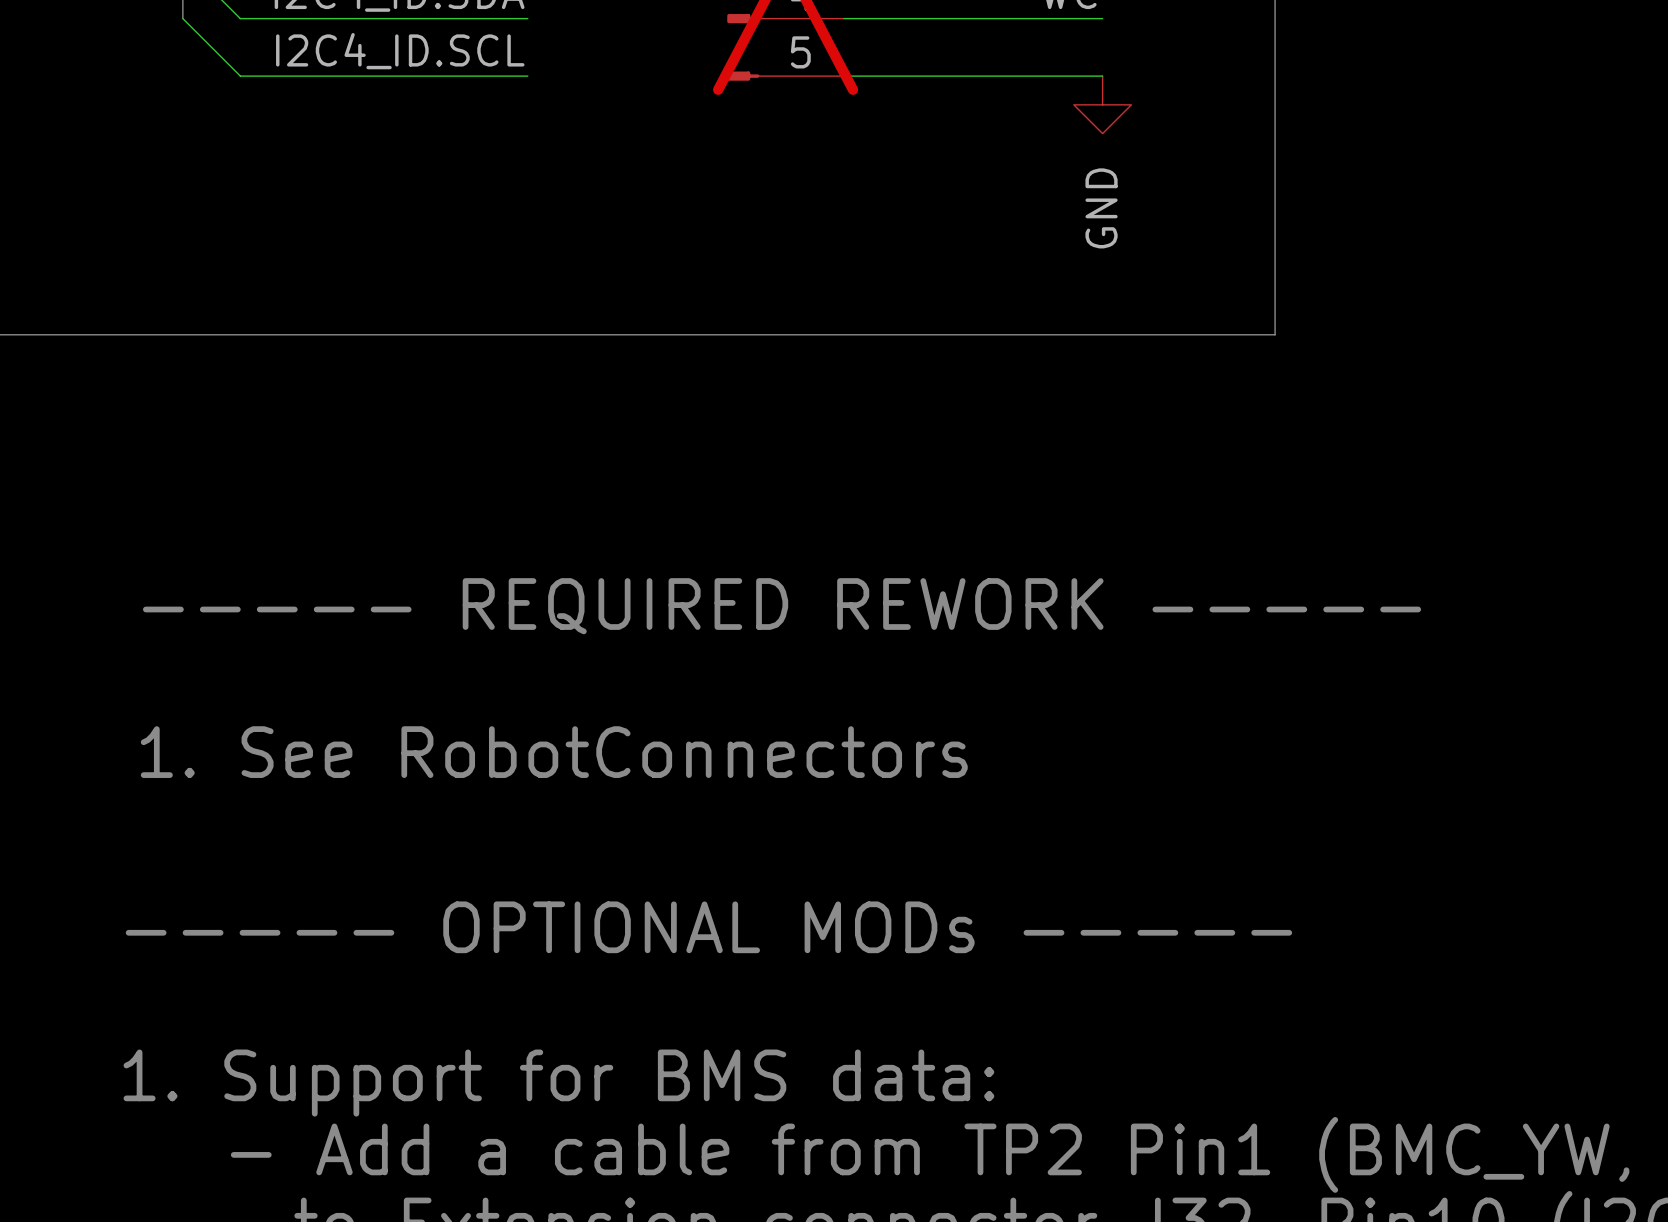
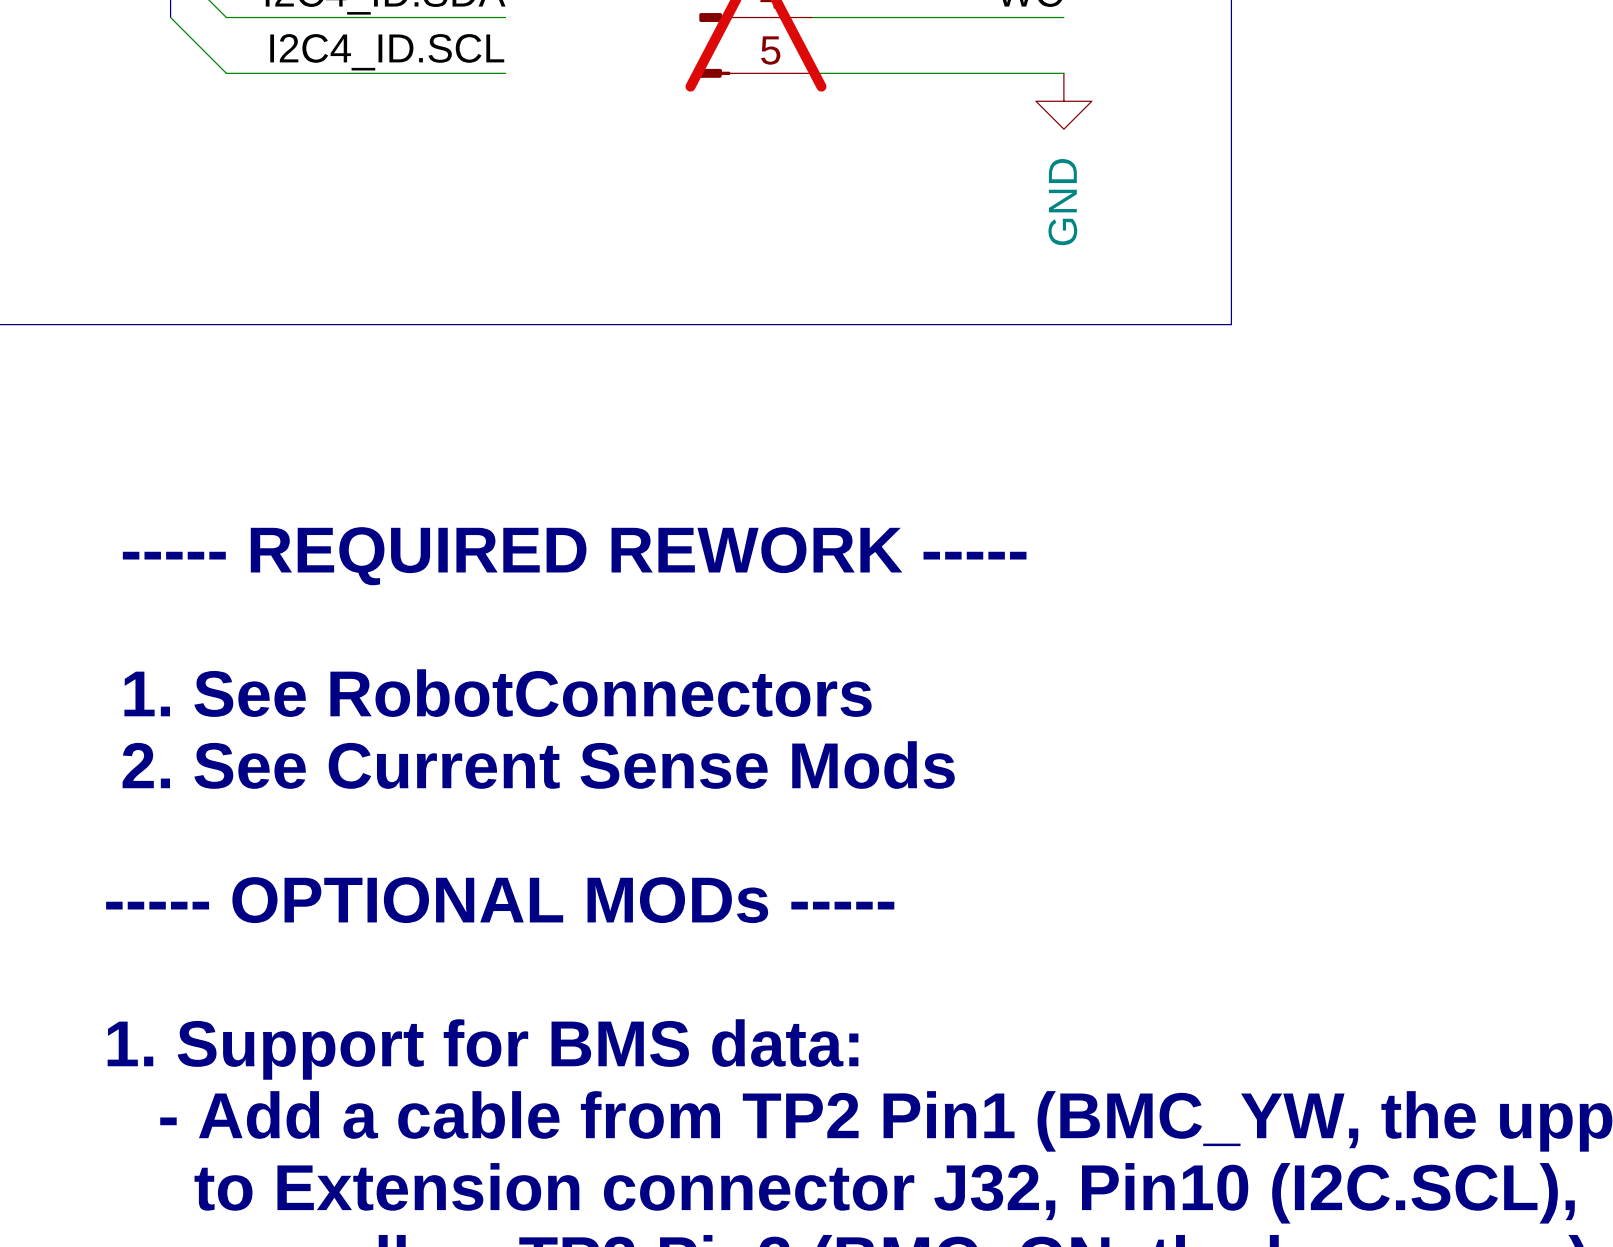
text position: ----- REQUIRED REWORK ----- (782, 606) -> ----- REQUIRED REWORK ----- (574, 556)
text position: 1. See RobotConnectors (554, 752) -> 1. See RobotConnectors (498, 693)
text: none -> 2. See Current Sense Mods (538, 765)

